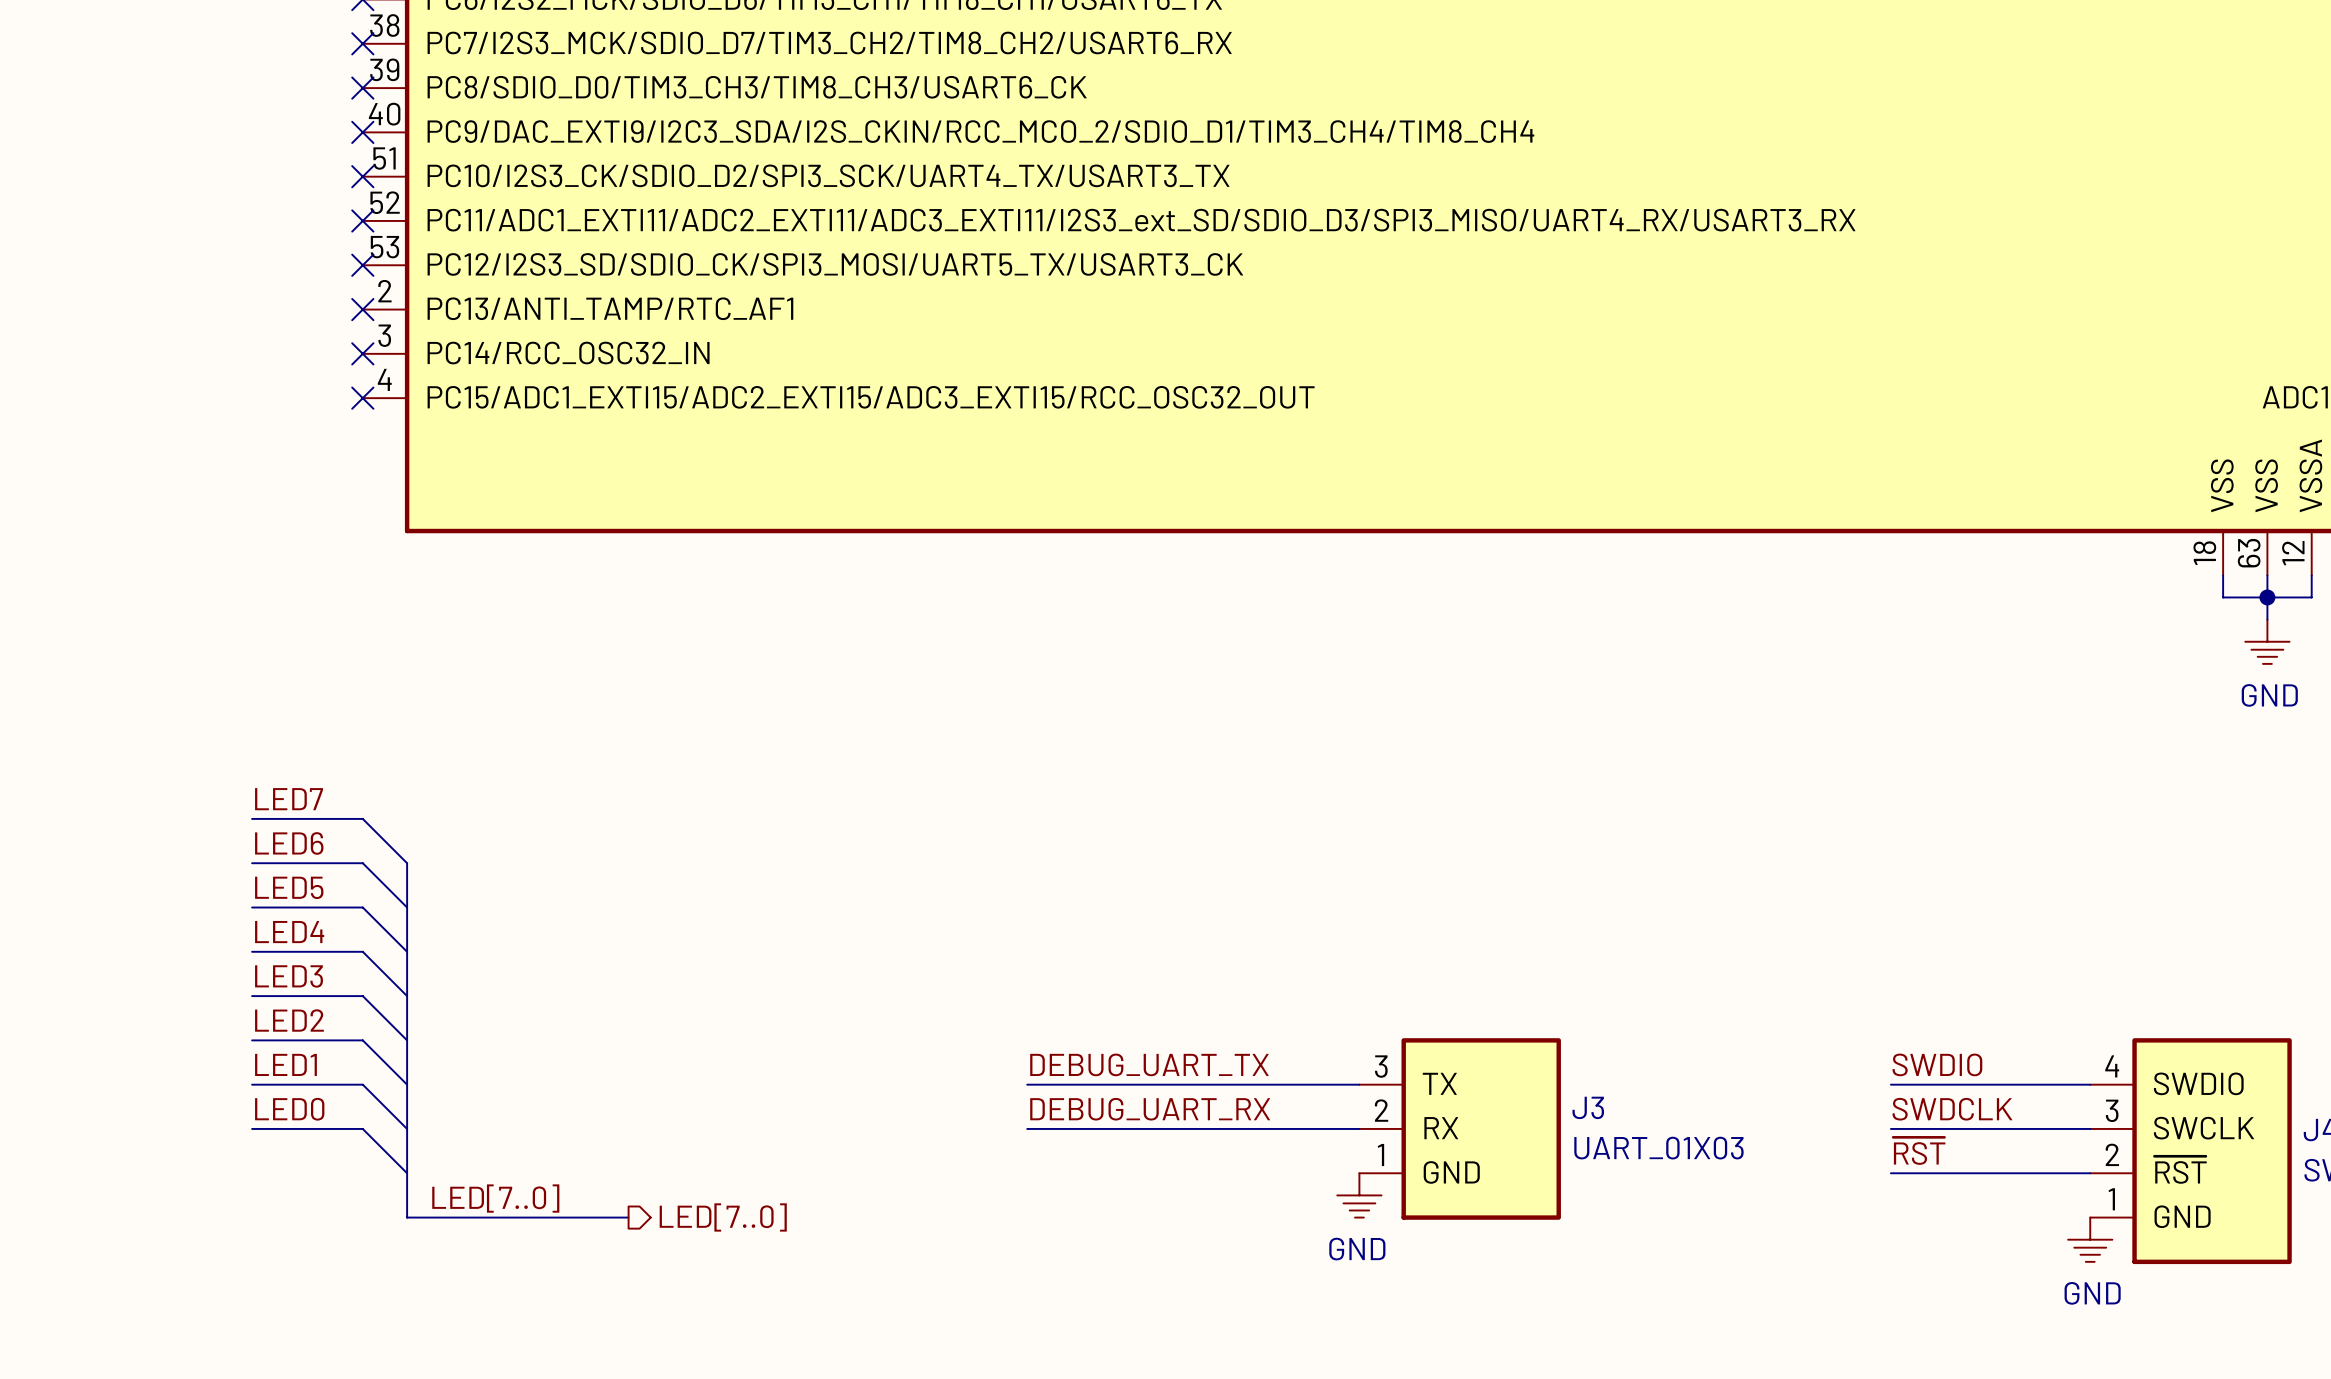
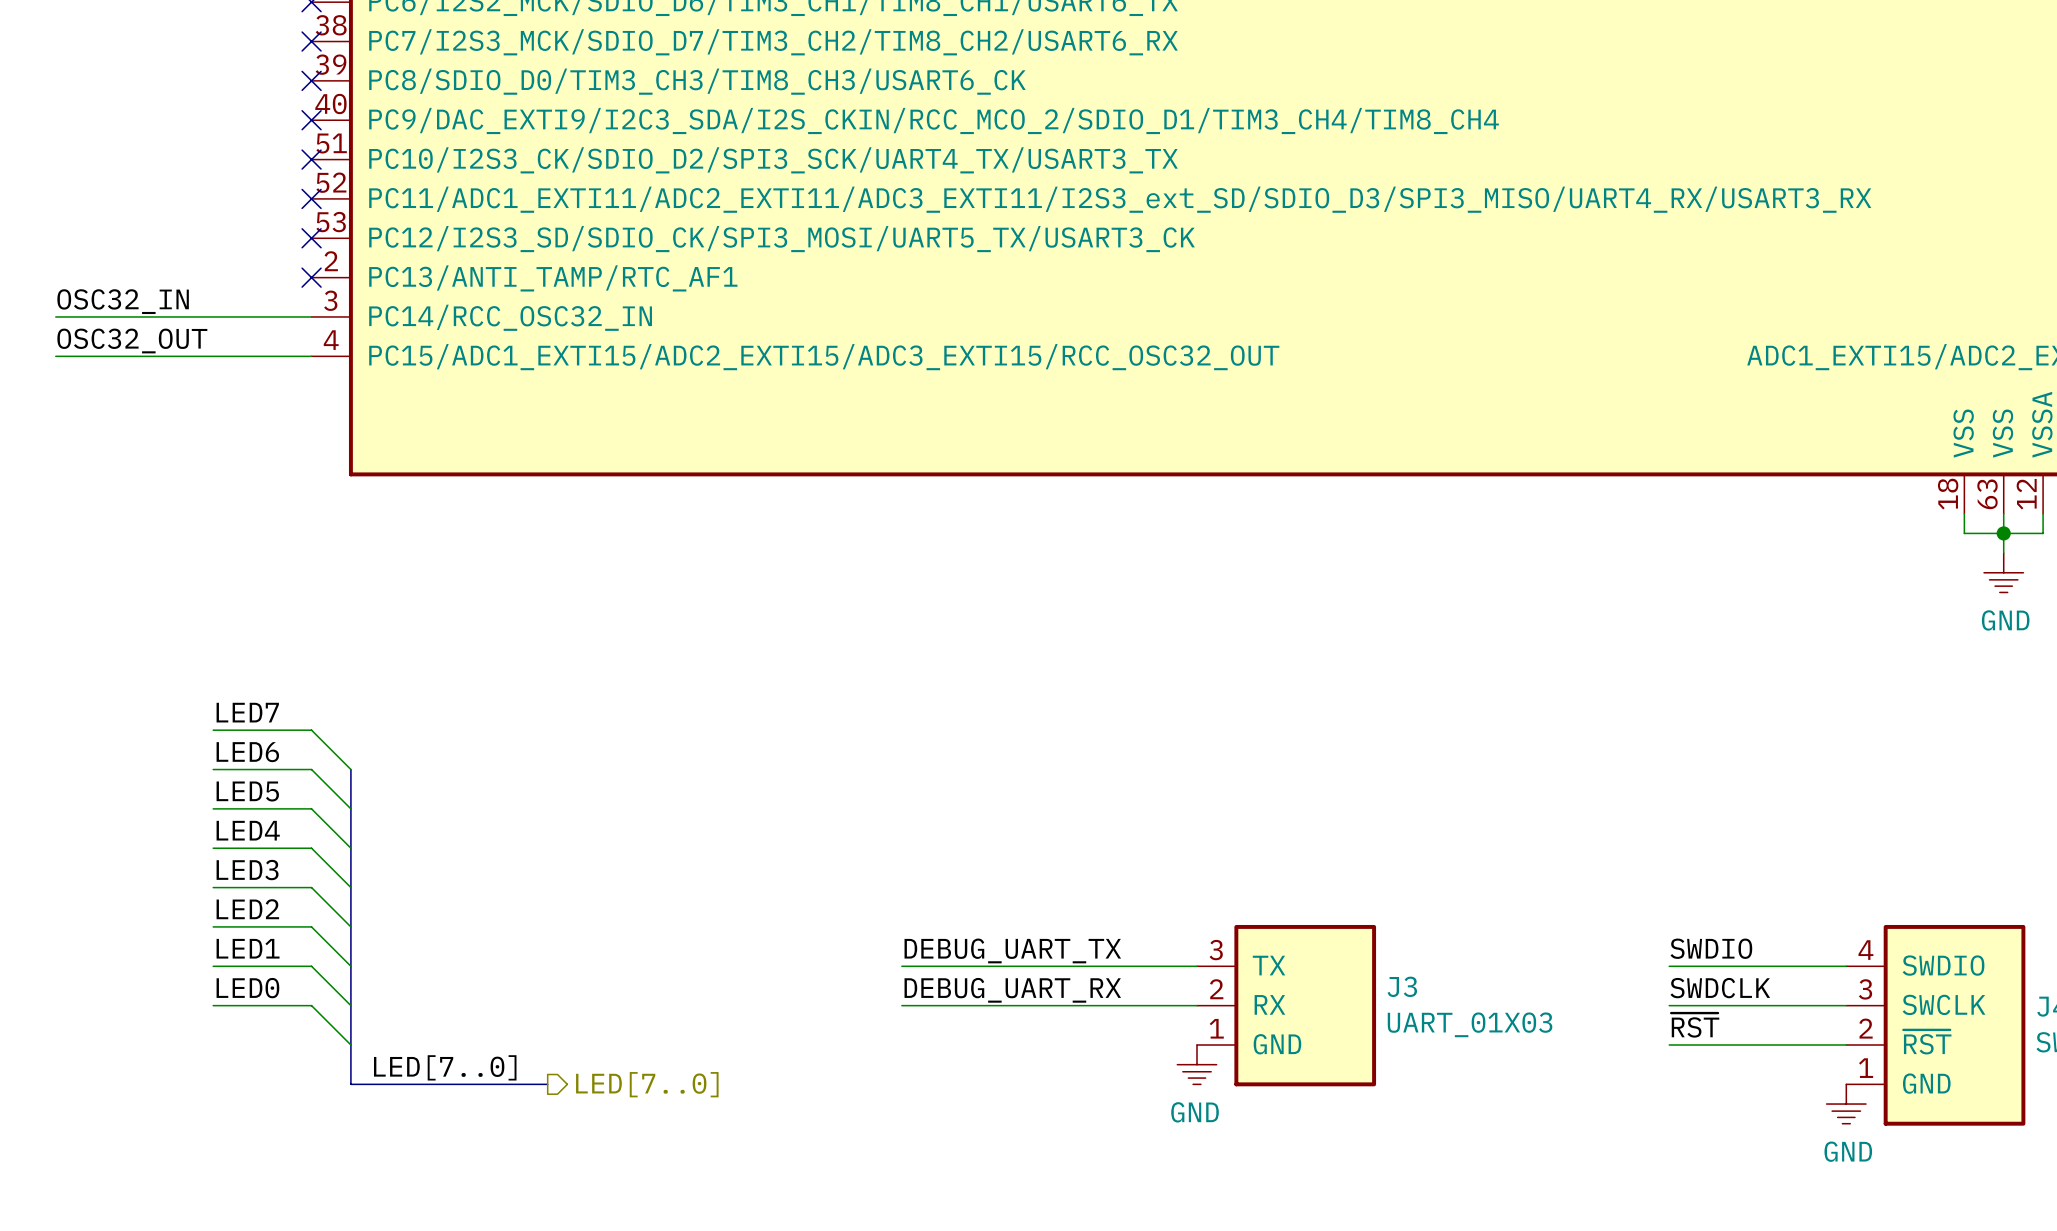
label: none -> OSC32_IN (123, 301)
wire: none -> (55, 316) (311, 316)
no-connect mark: (362, 353) -> none
label: none -> OSC32_OUT (132, 340)
wire: none -> (55, 356) (311, 356)
no-connect mark: (362, 398) -> none

